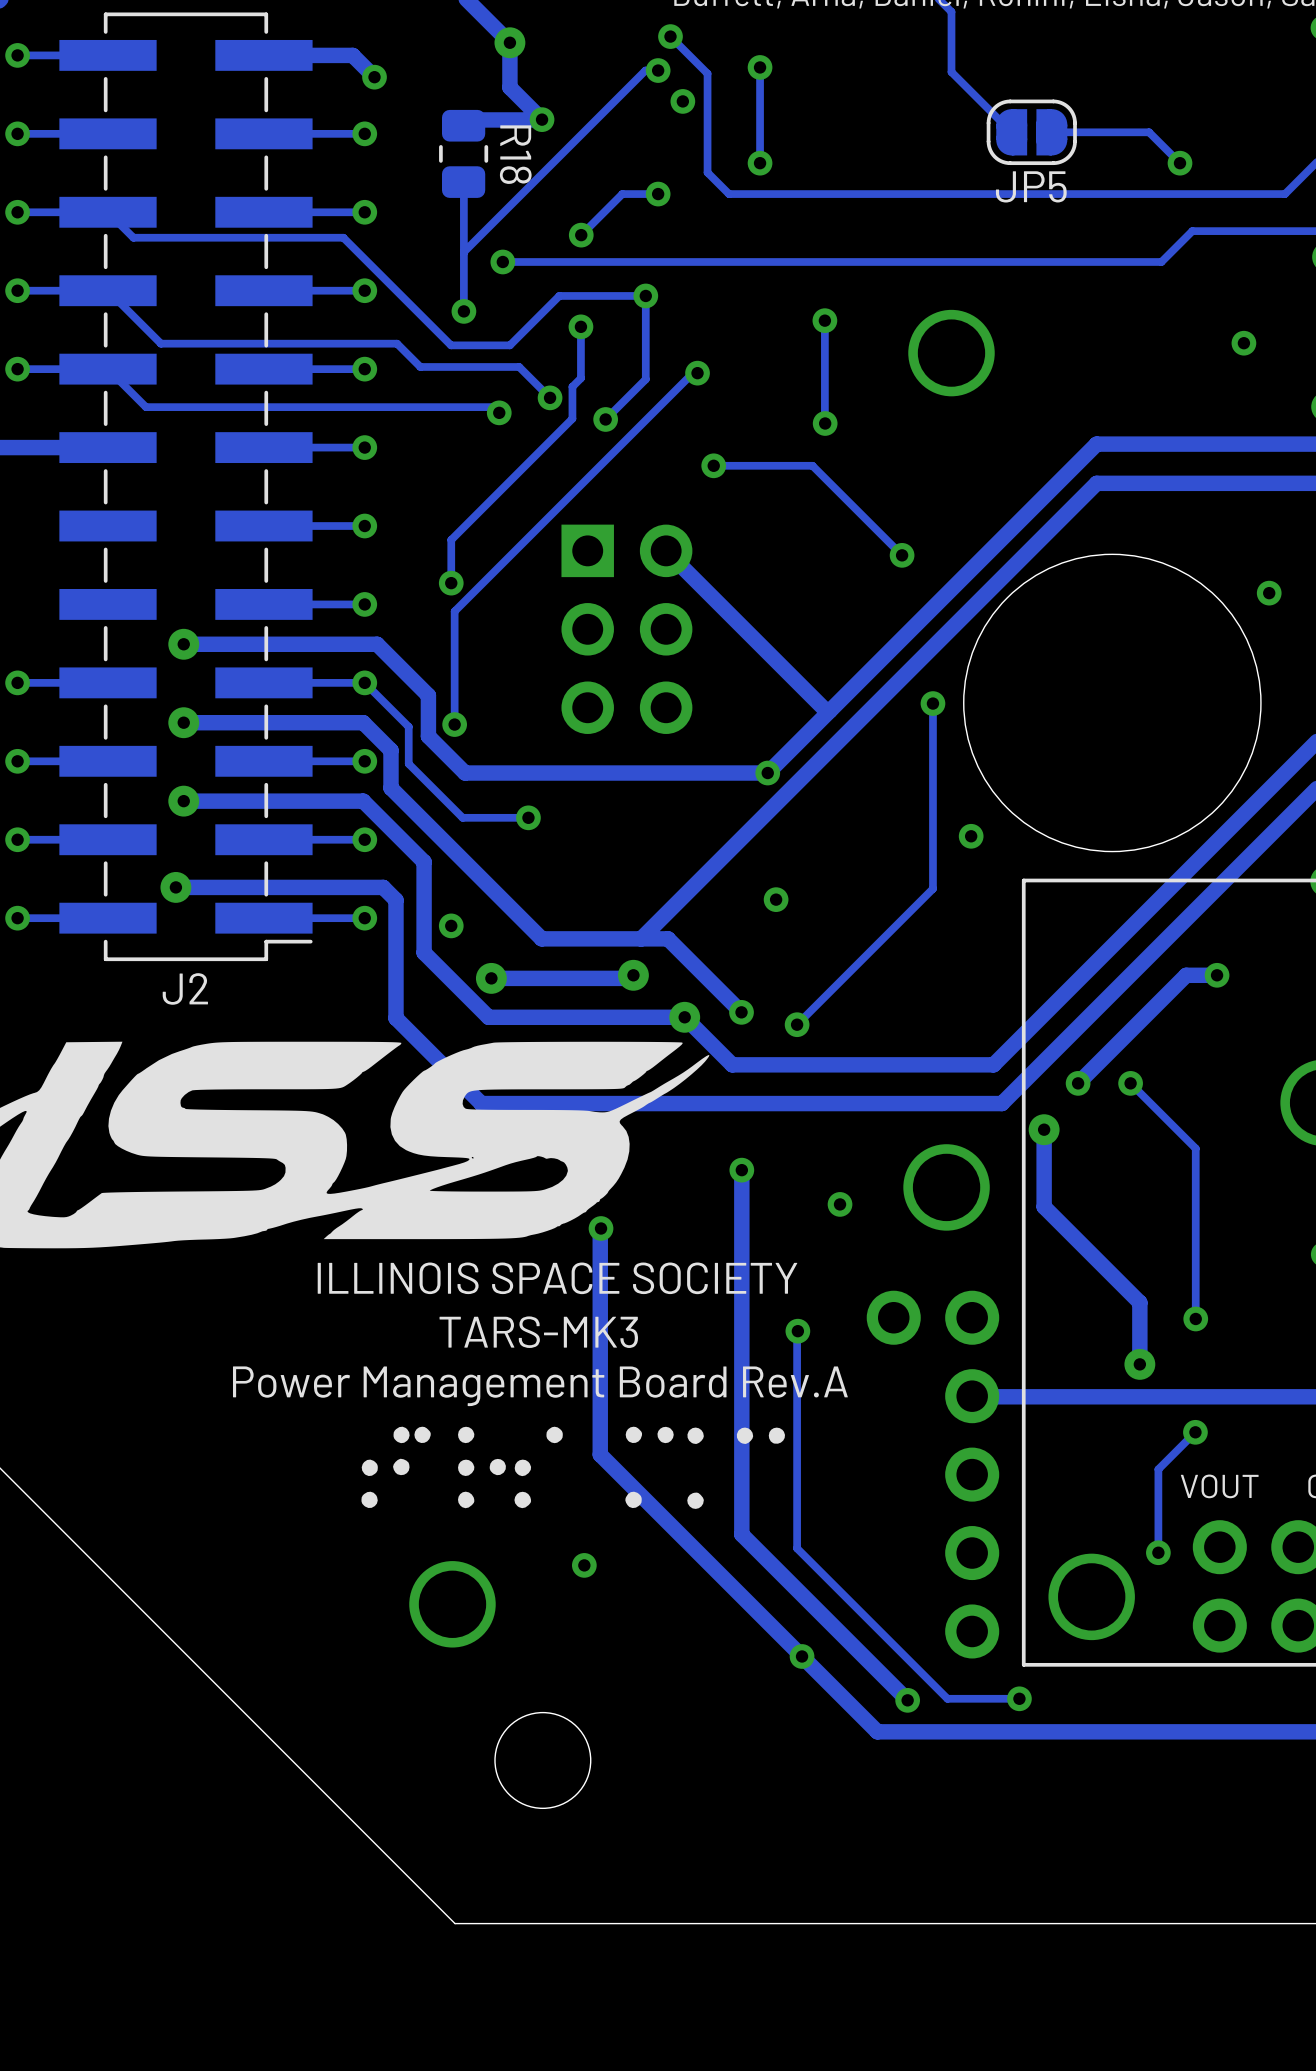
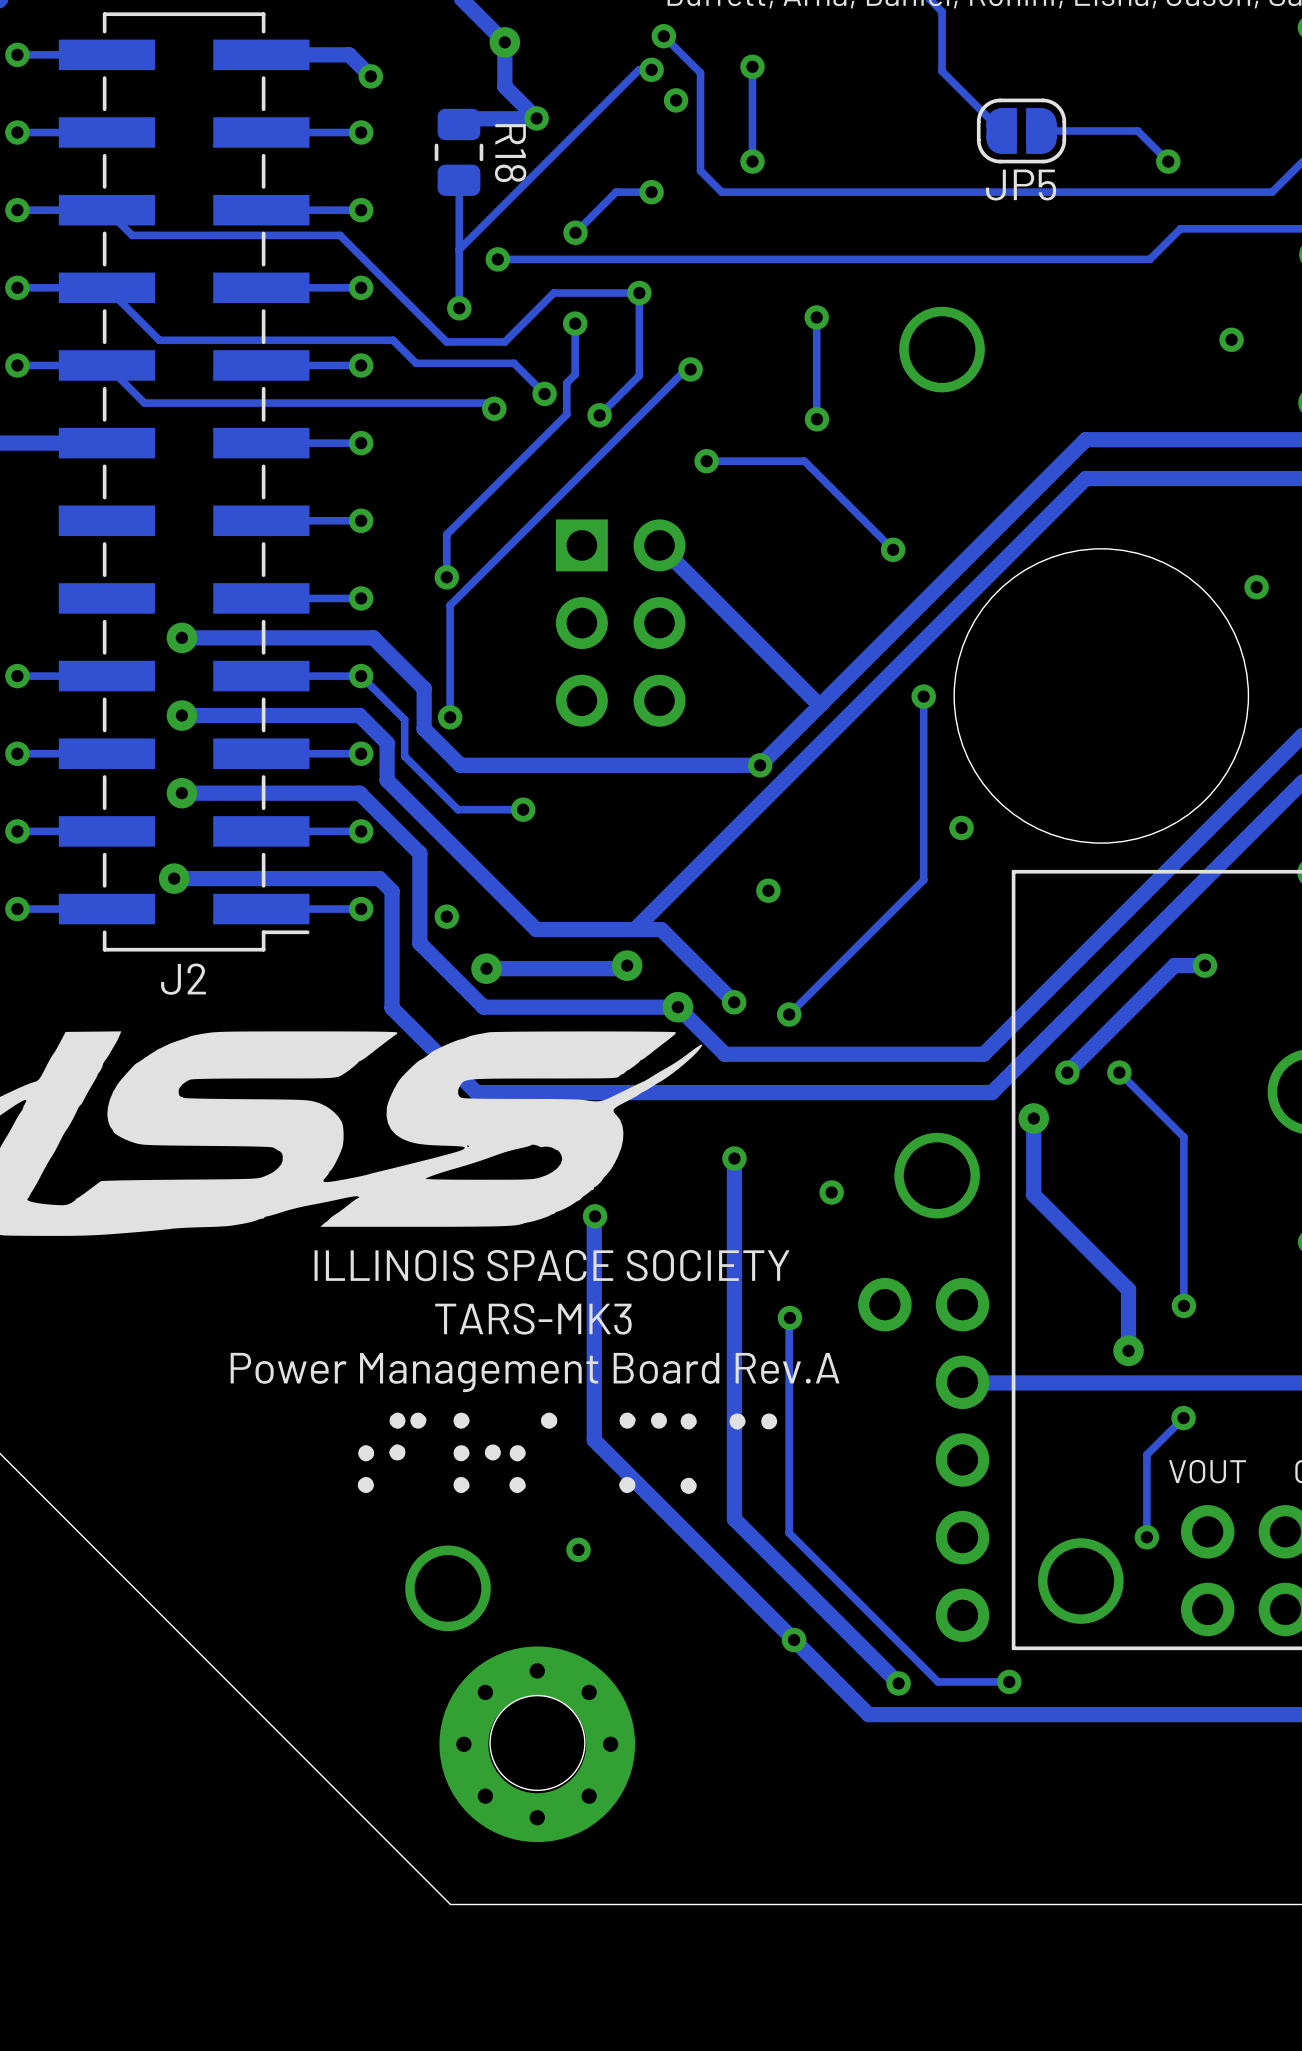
part: none -> (537, 1744)

